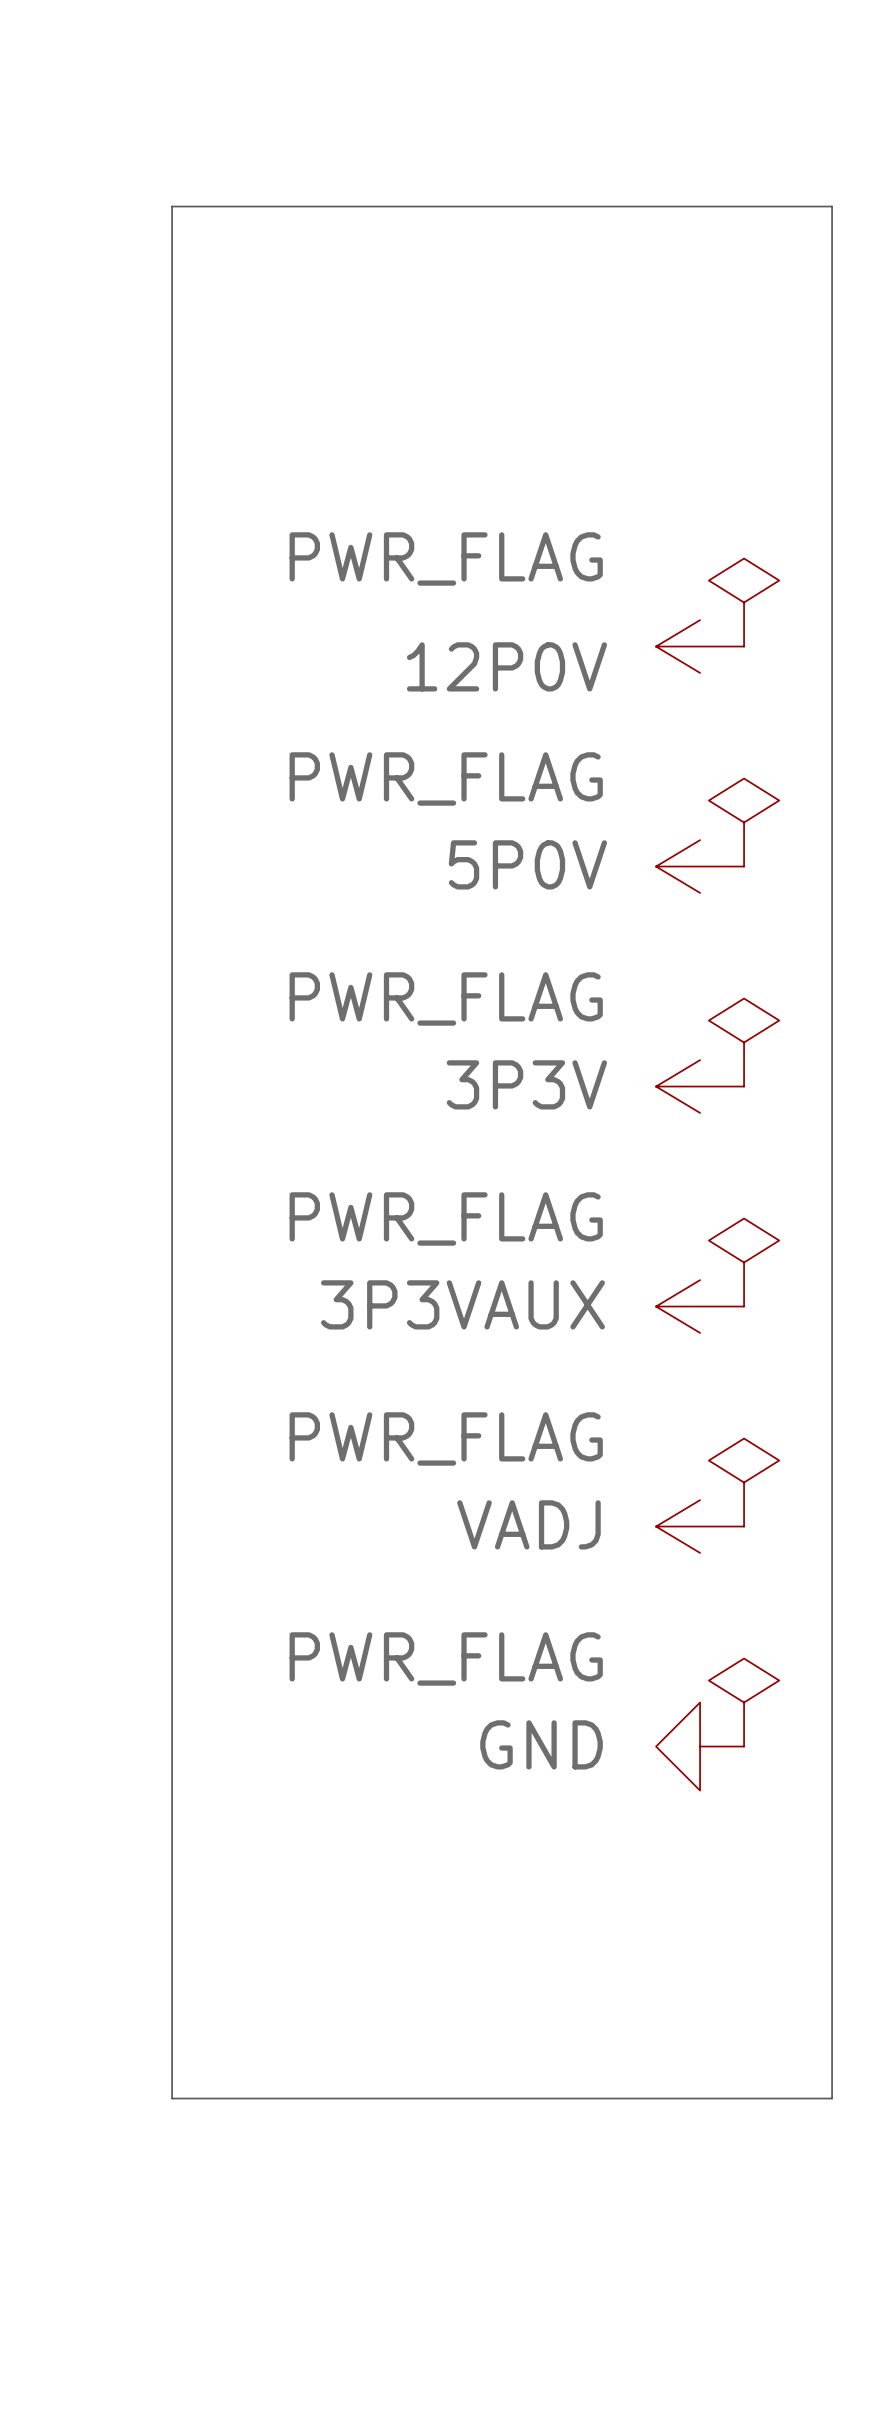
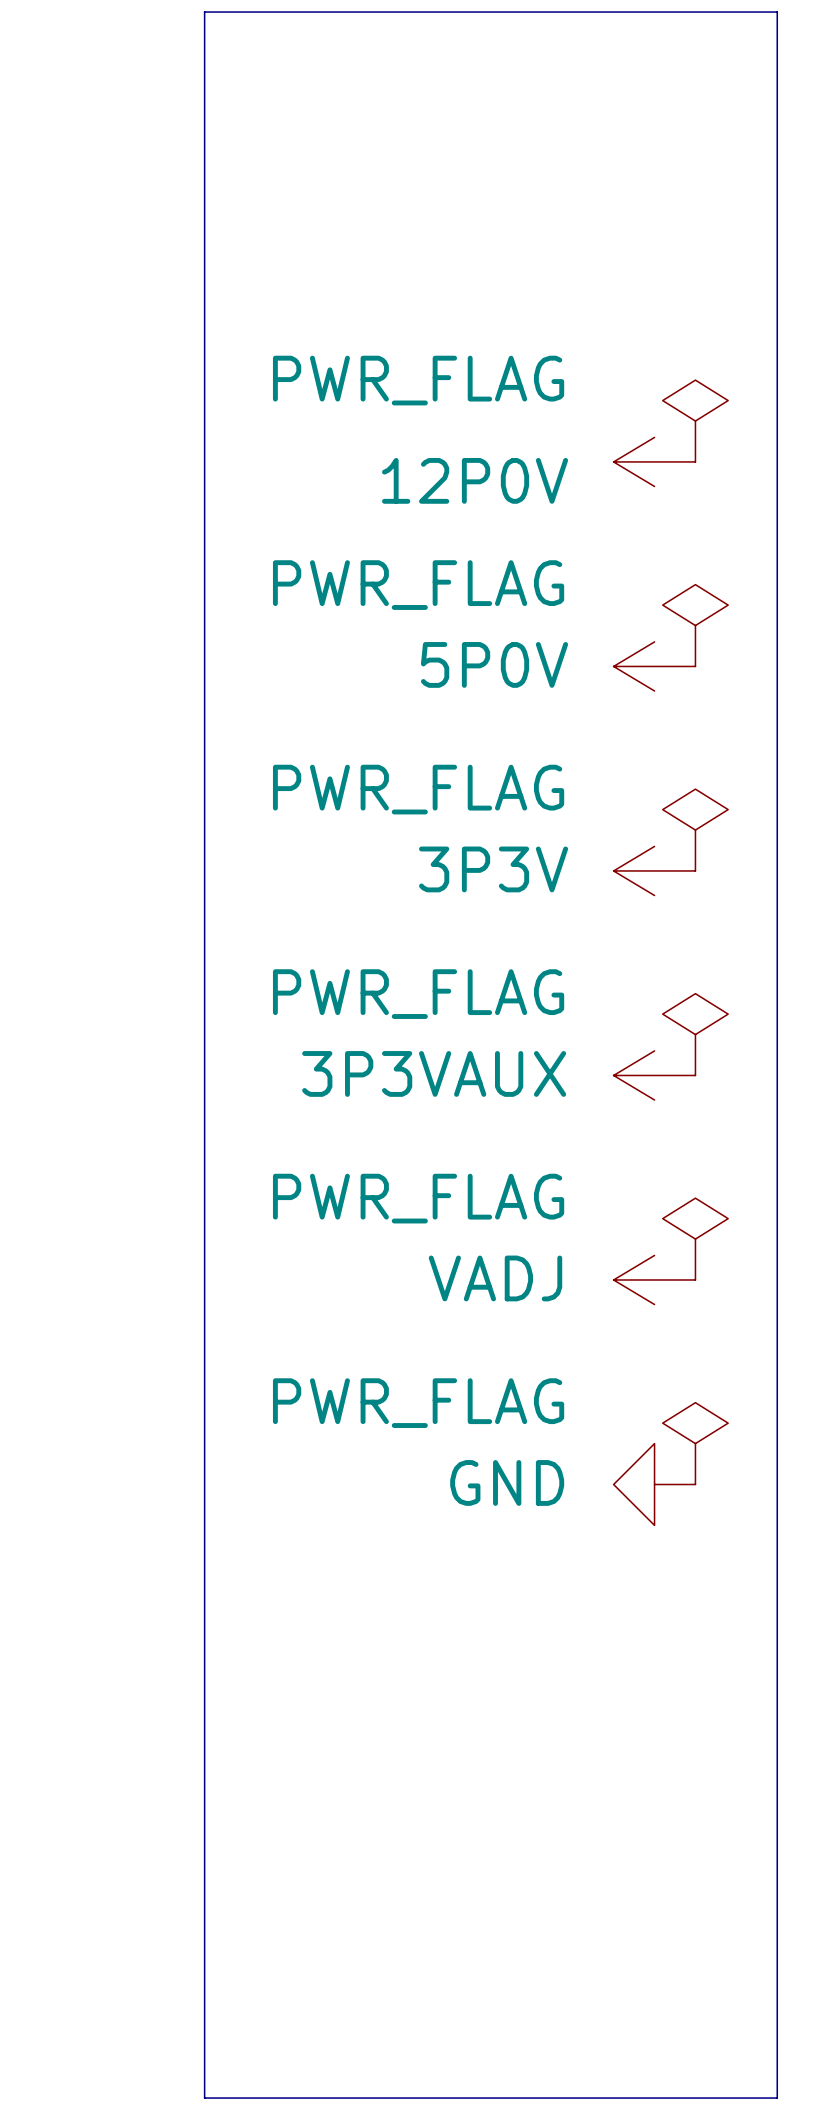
line: (832, 206) (172, 206) (172, 2098) (832, 2098) -> (777, 52) (777, 12) (204, 12) (204, 2098) (777, 2098) (777, 1811)

